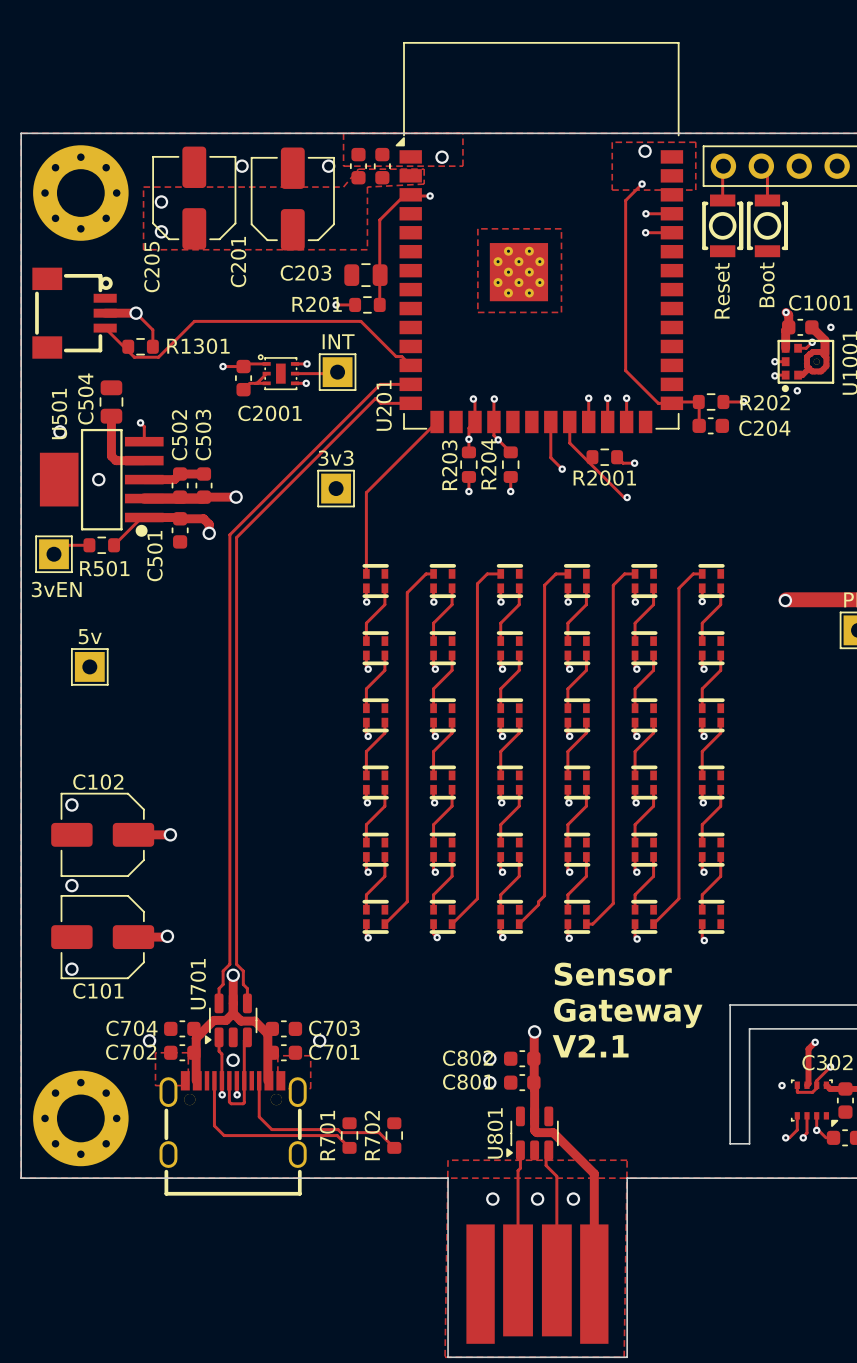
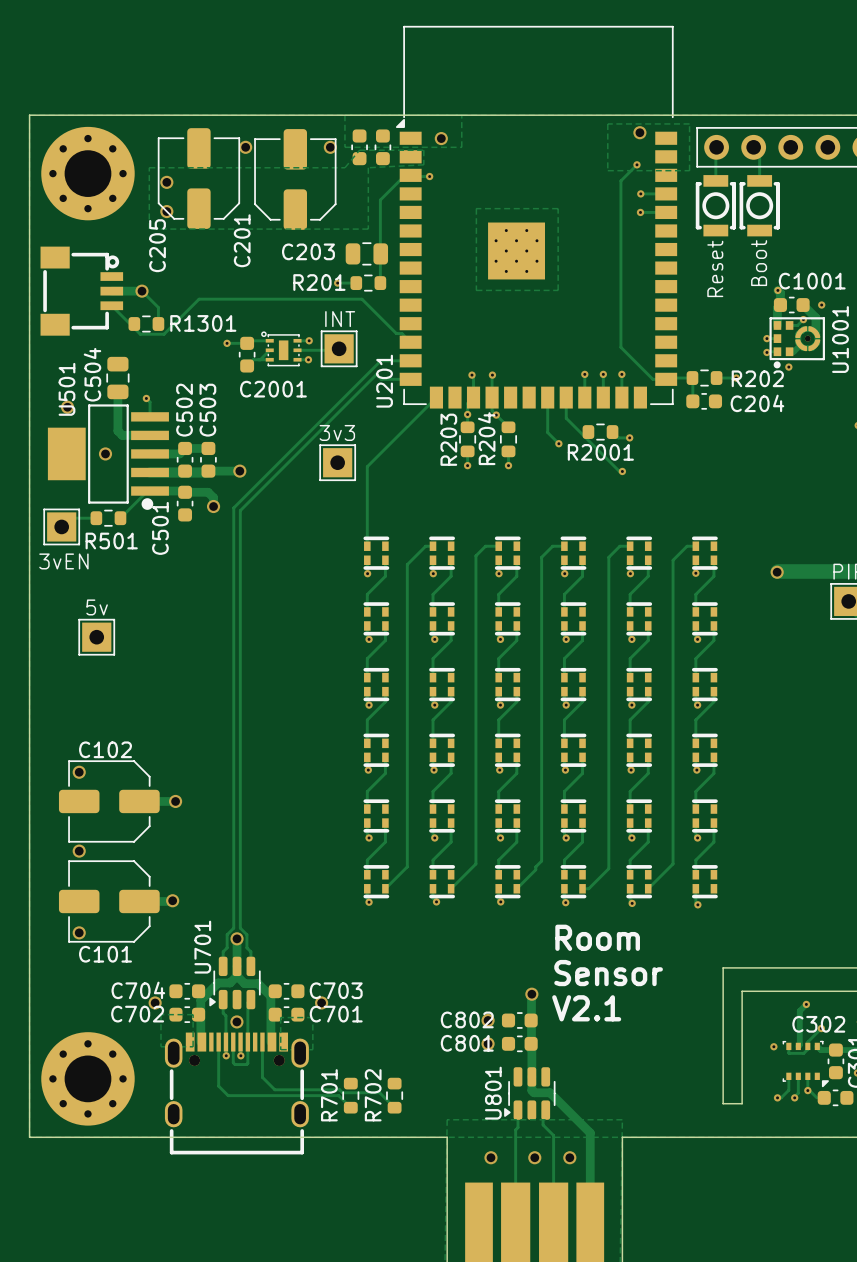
text: Sensor (613, 974) -> Room (597, 937)
text: Gateway (628, 1013) -> Sensor (608, 973)

